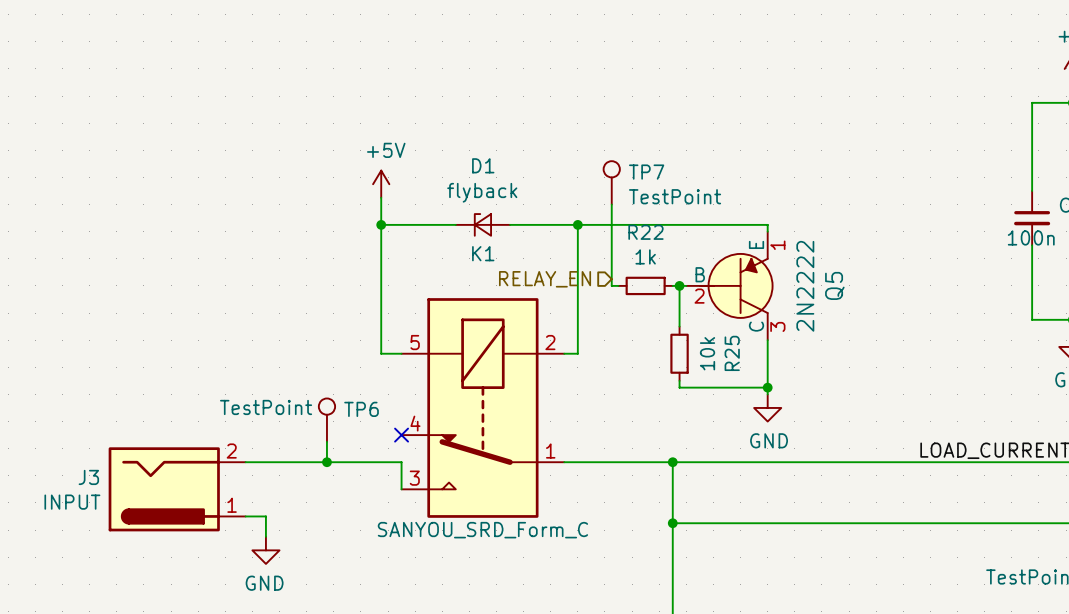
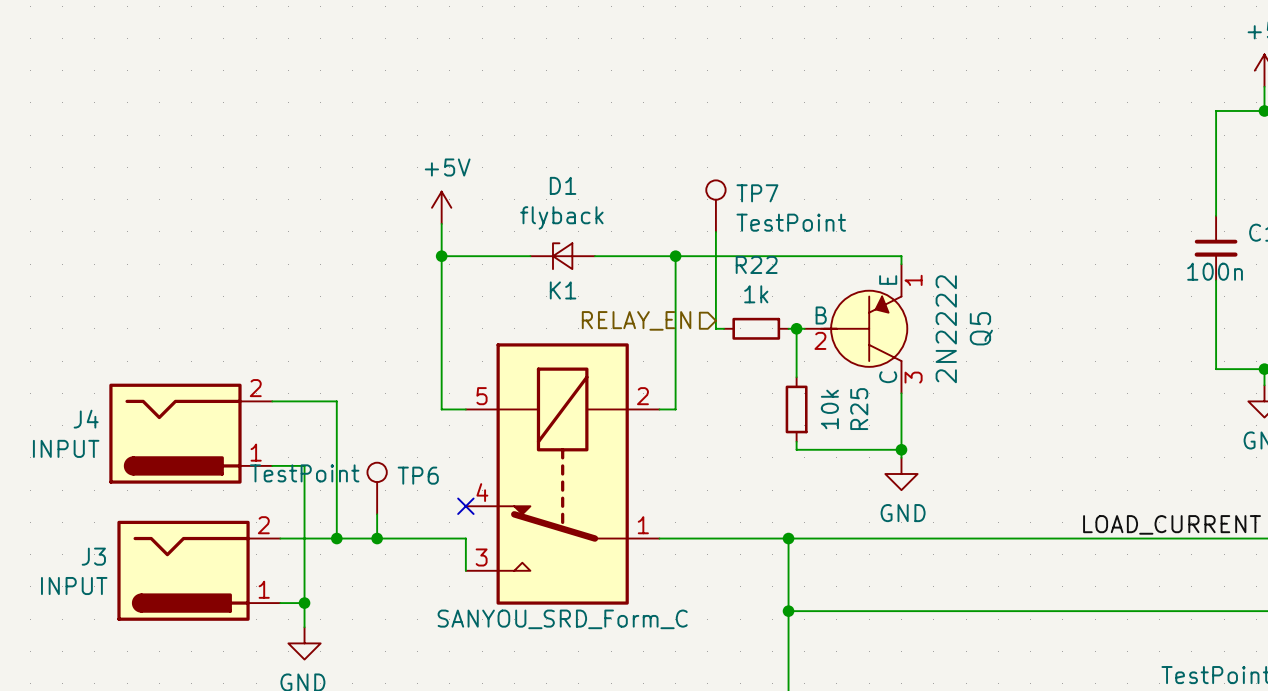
wire: none -> (272, 401) (336, 401) (336, 538)
J4: none -> INPUT (190, 433)
wire: none -> (272, 465) (304, 465) (304, 603)
junction: none -> (336, 538)
junction: none -> (304, 603)

